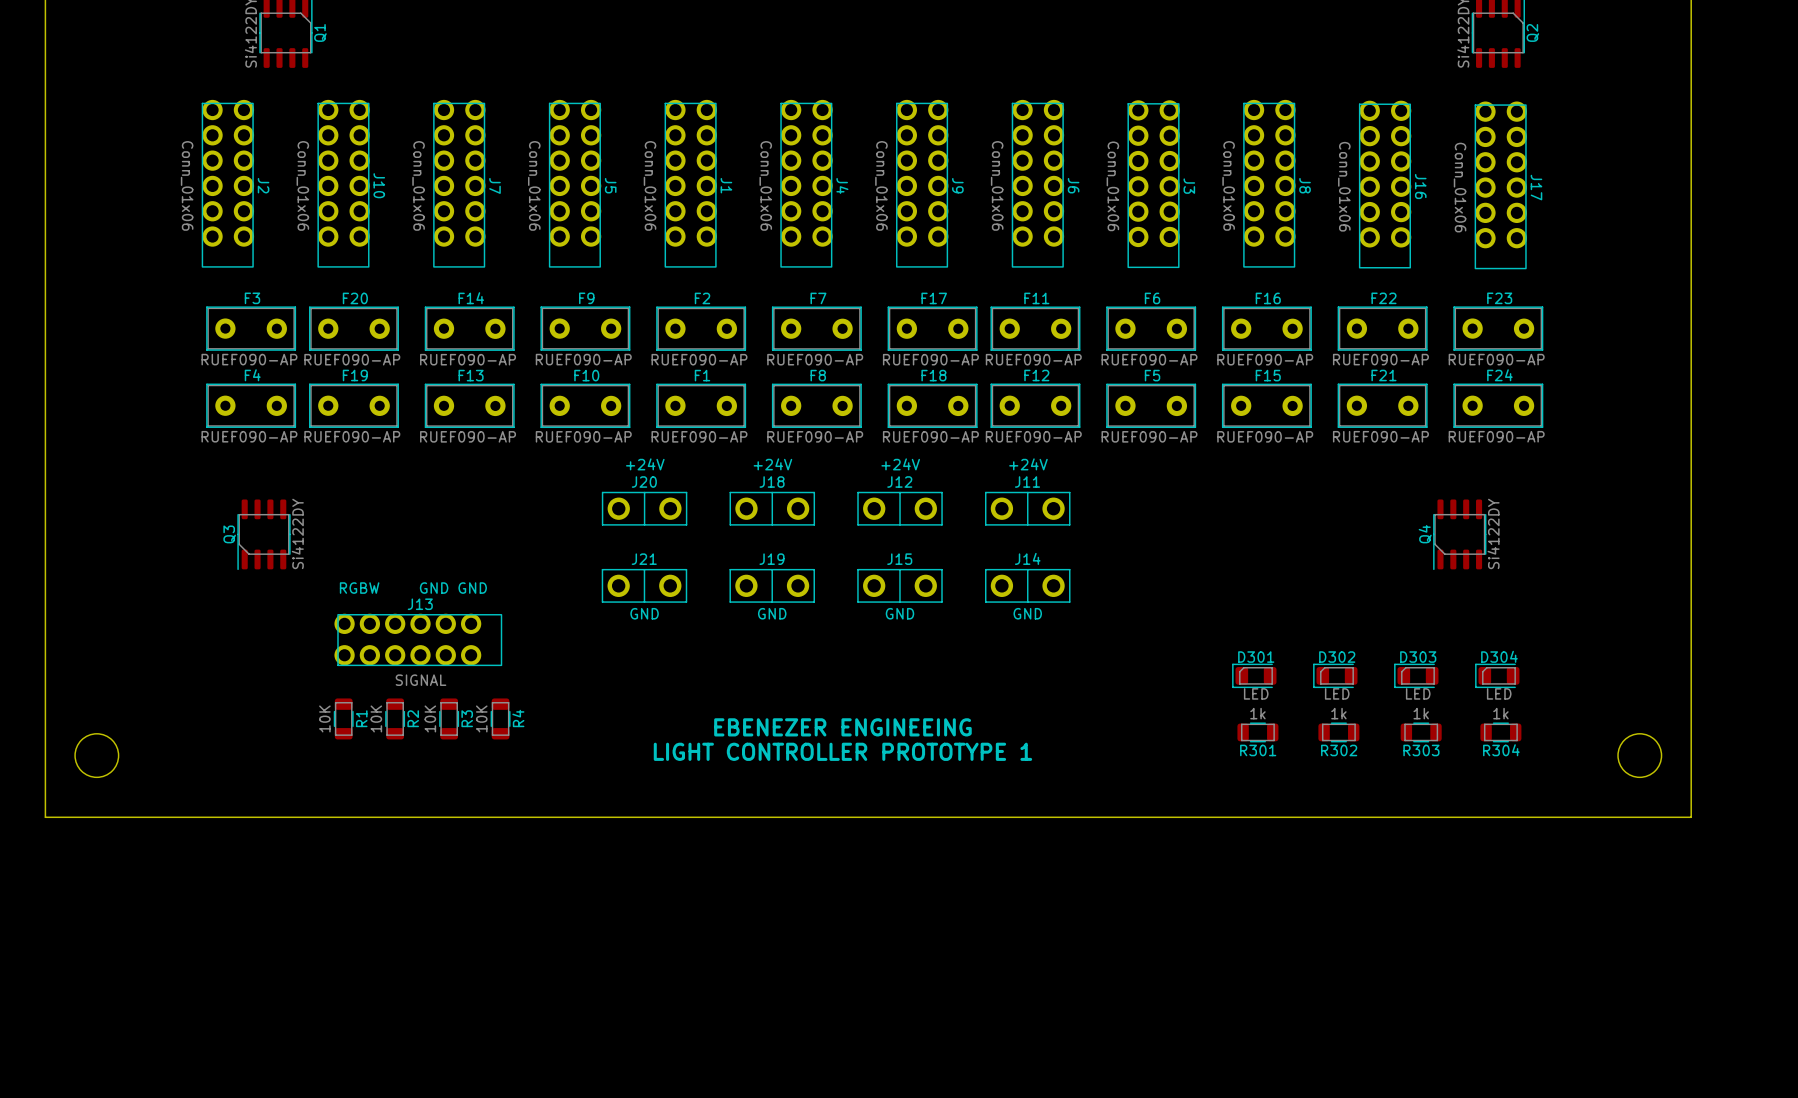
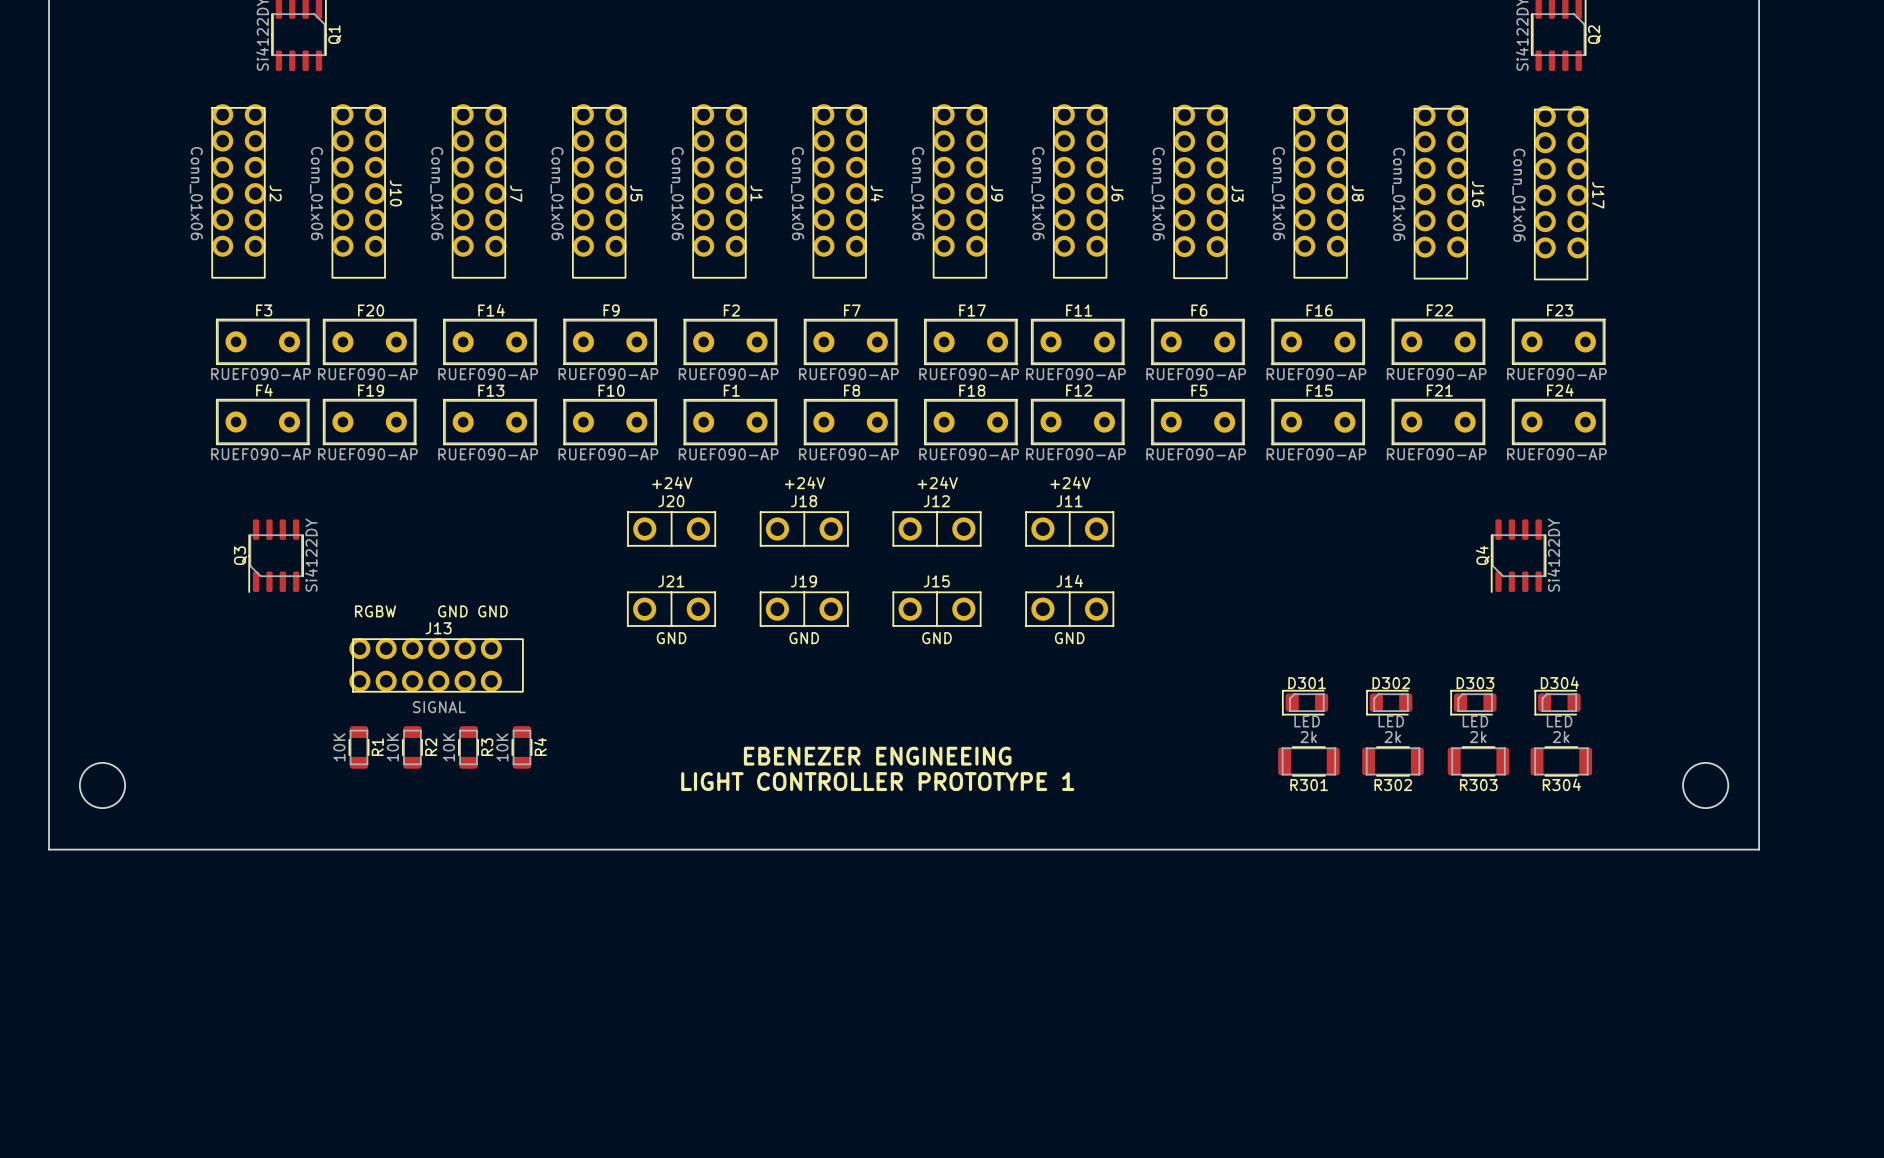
R301 value: 1k (1257, 713) -> 2k (1308, 737)
R302 value: 1k (1338, 713) -> 2k (1392, 737)
R303 value: 1k (1421, 713) -> 2k (1478, 737)
R304 value: 1k (1500, 713) -> 2k (1561, 737)
R301 footprint: [1237, 722, 1279, 743] -> [1278, 746, 1340, 777]
R302 footprint: [1318, 722, 1360, 743] -> [1362, 746, 1424, 777]
R303 footprint: [1400, 722, 1442, 743] -> [1447, 746, 1510, 777]
R304 footprint: [1480, 722, 1522, 743] -> [1530, 746, 1593, 777]

